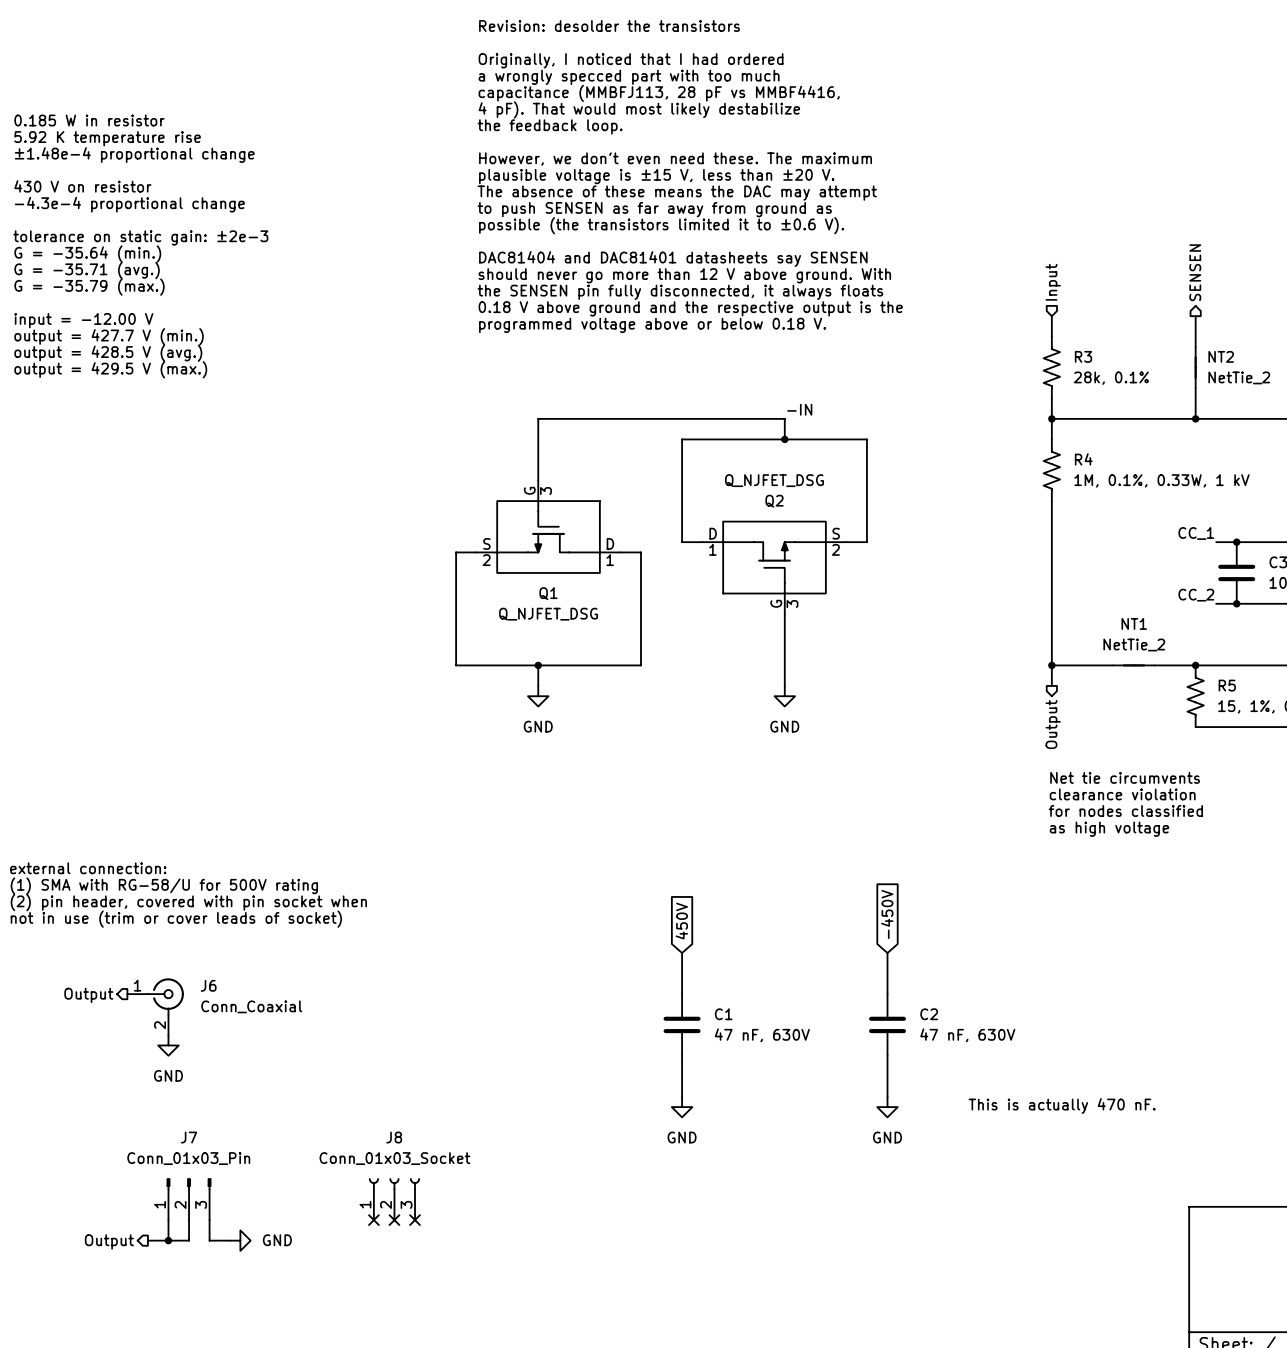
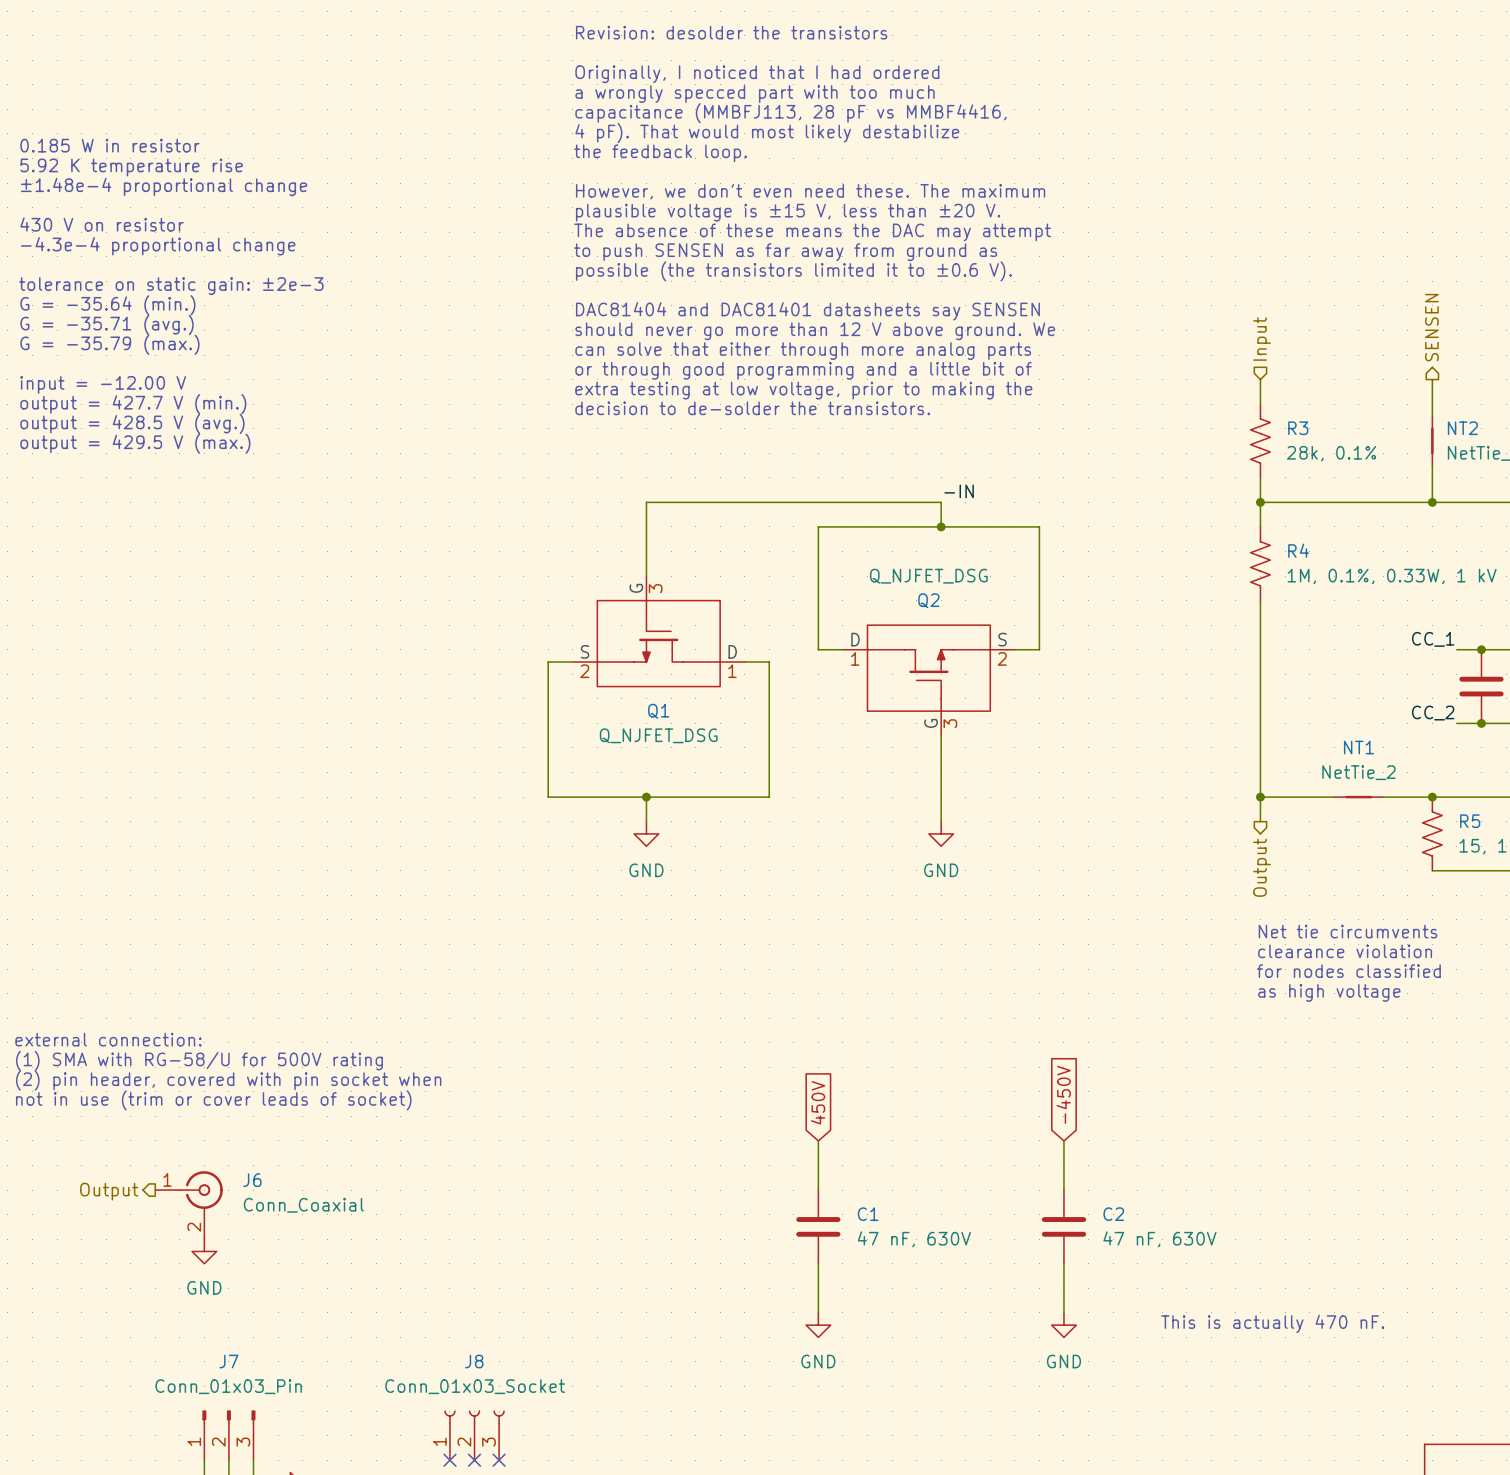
text: should never go more than 12 V above ground. With (684, 275) -> should never go more than 12 V above ground. We (815, 331)
text: the SENSEN pin fully disconnected, it always floats (680, 292) -> can solve that either through more analog parts (803, 351)
text: 0.18 V above ground and the respective output is the (690, 308) -> or through good programming and a little bit of (803, 370)
text: programmed voltage above or below 0.18 V. (652, 325) -> extra testing at low voltage, prior to making the (803, 390)
text: none -> decision to de-solder the transistors. (752, 408)

